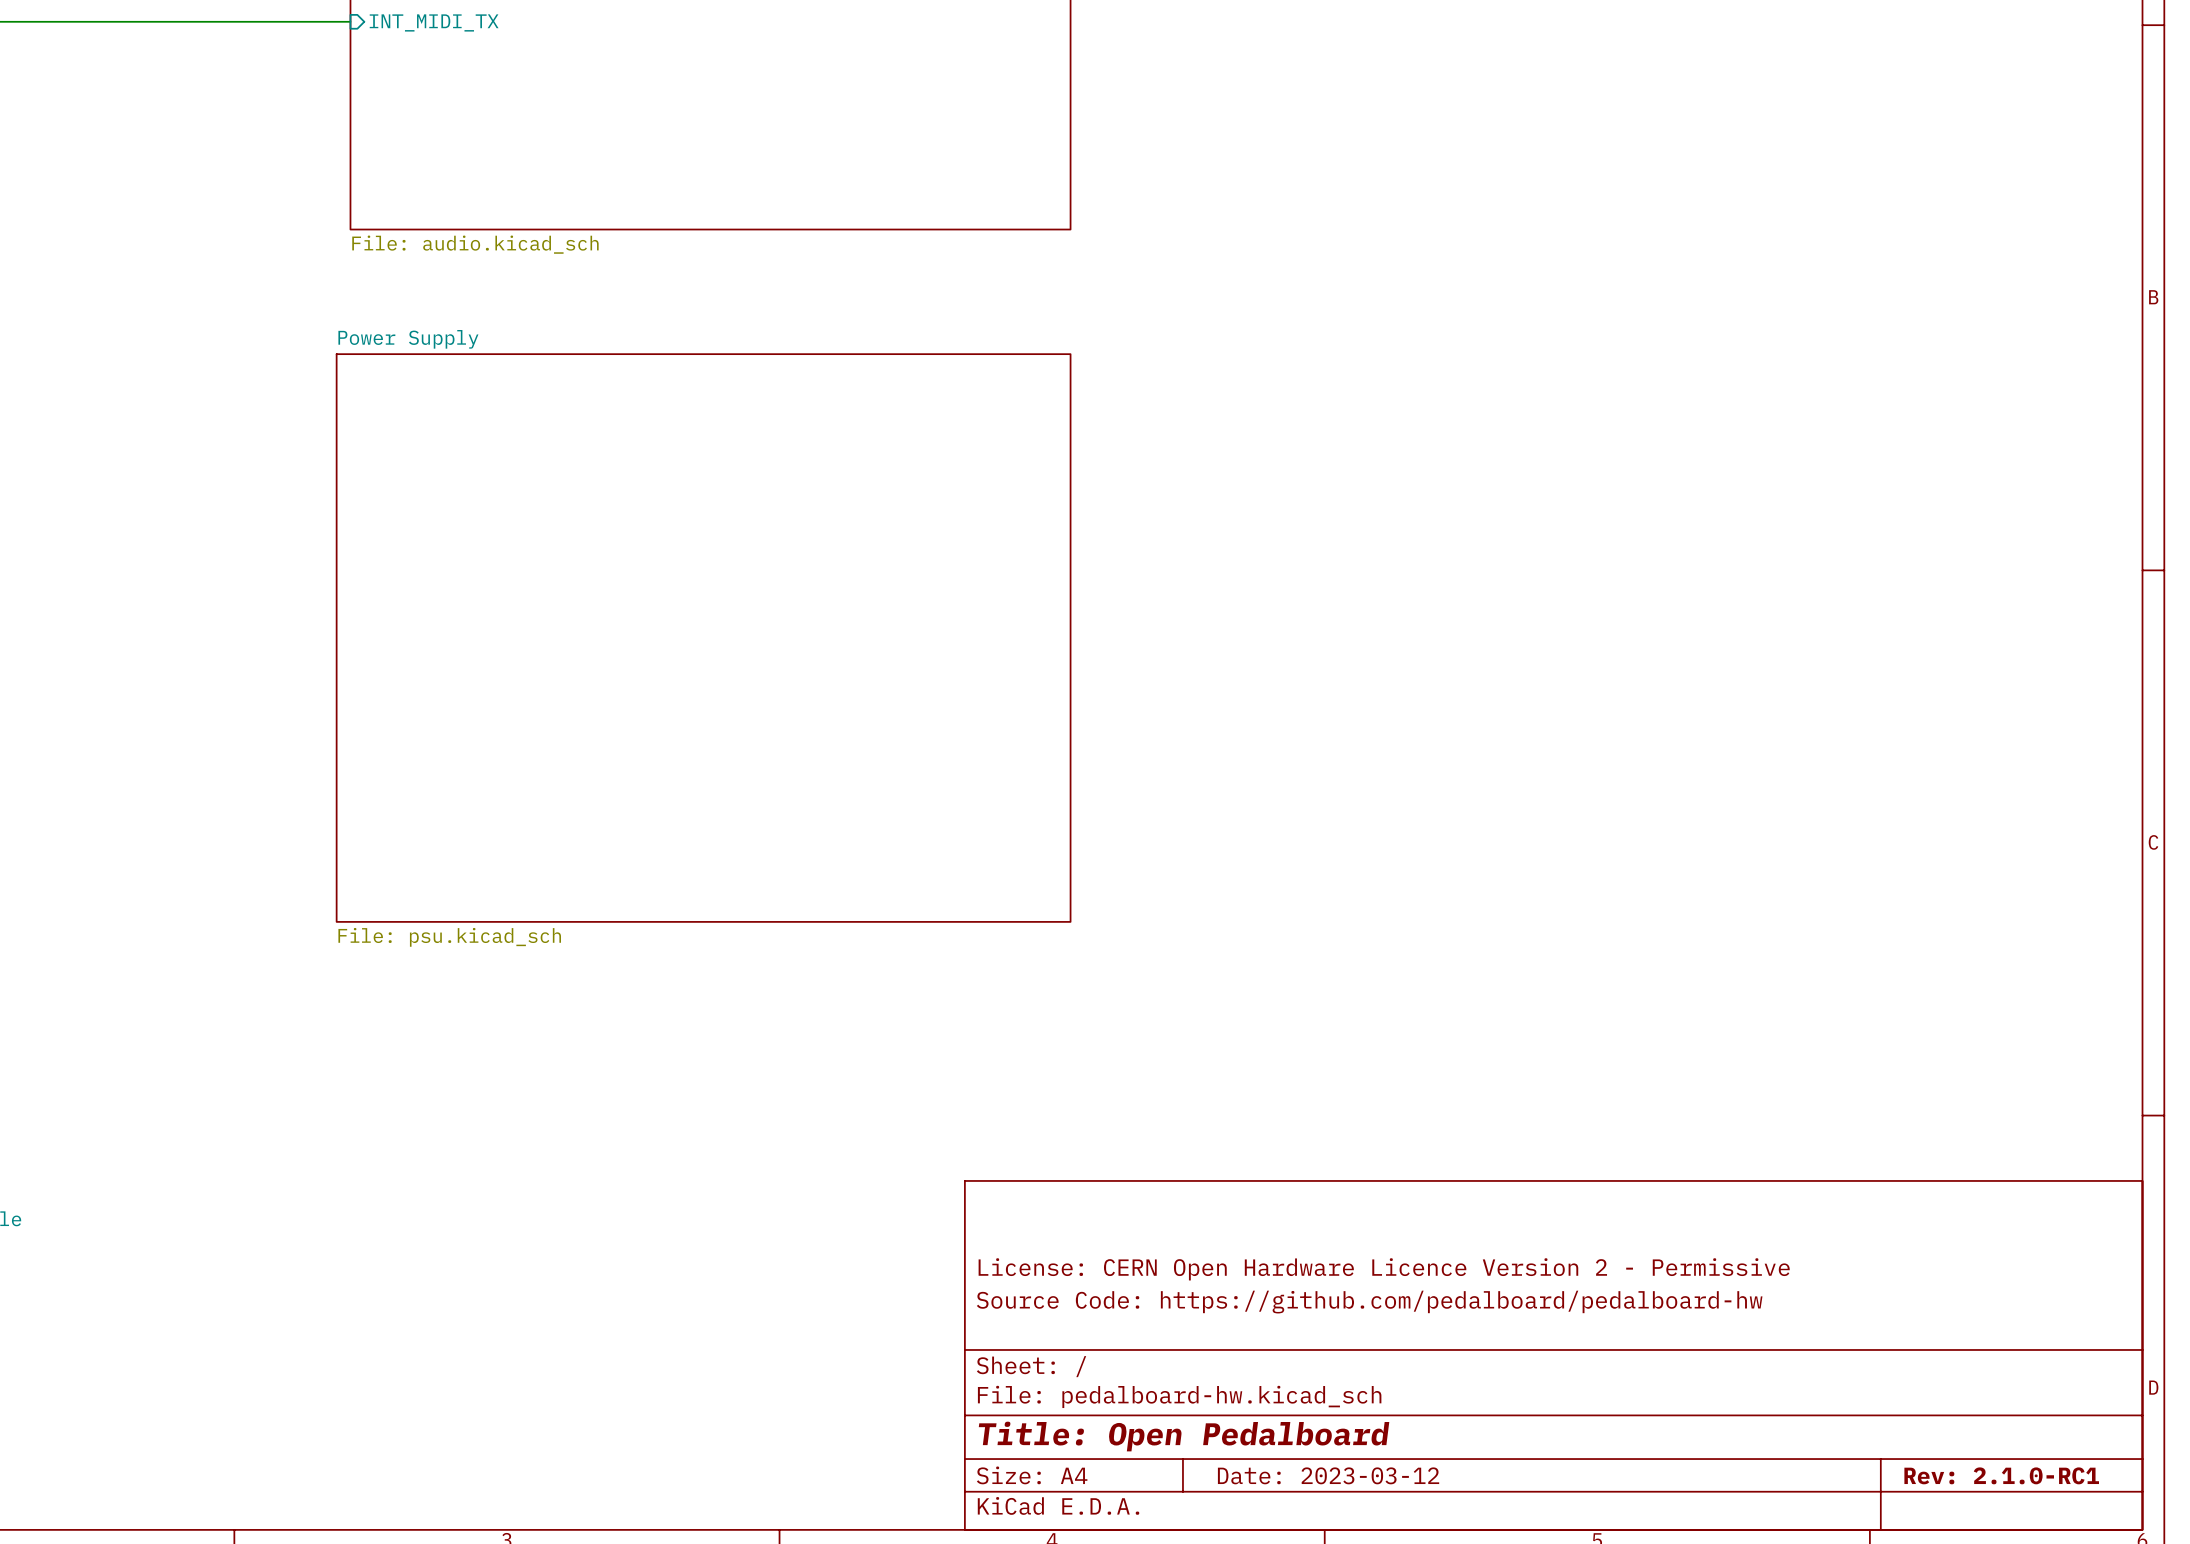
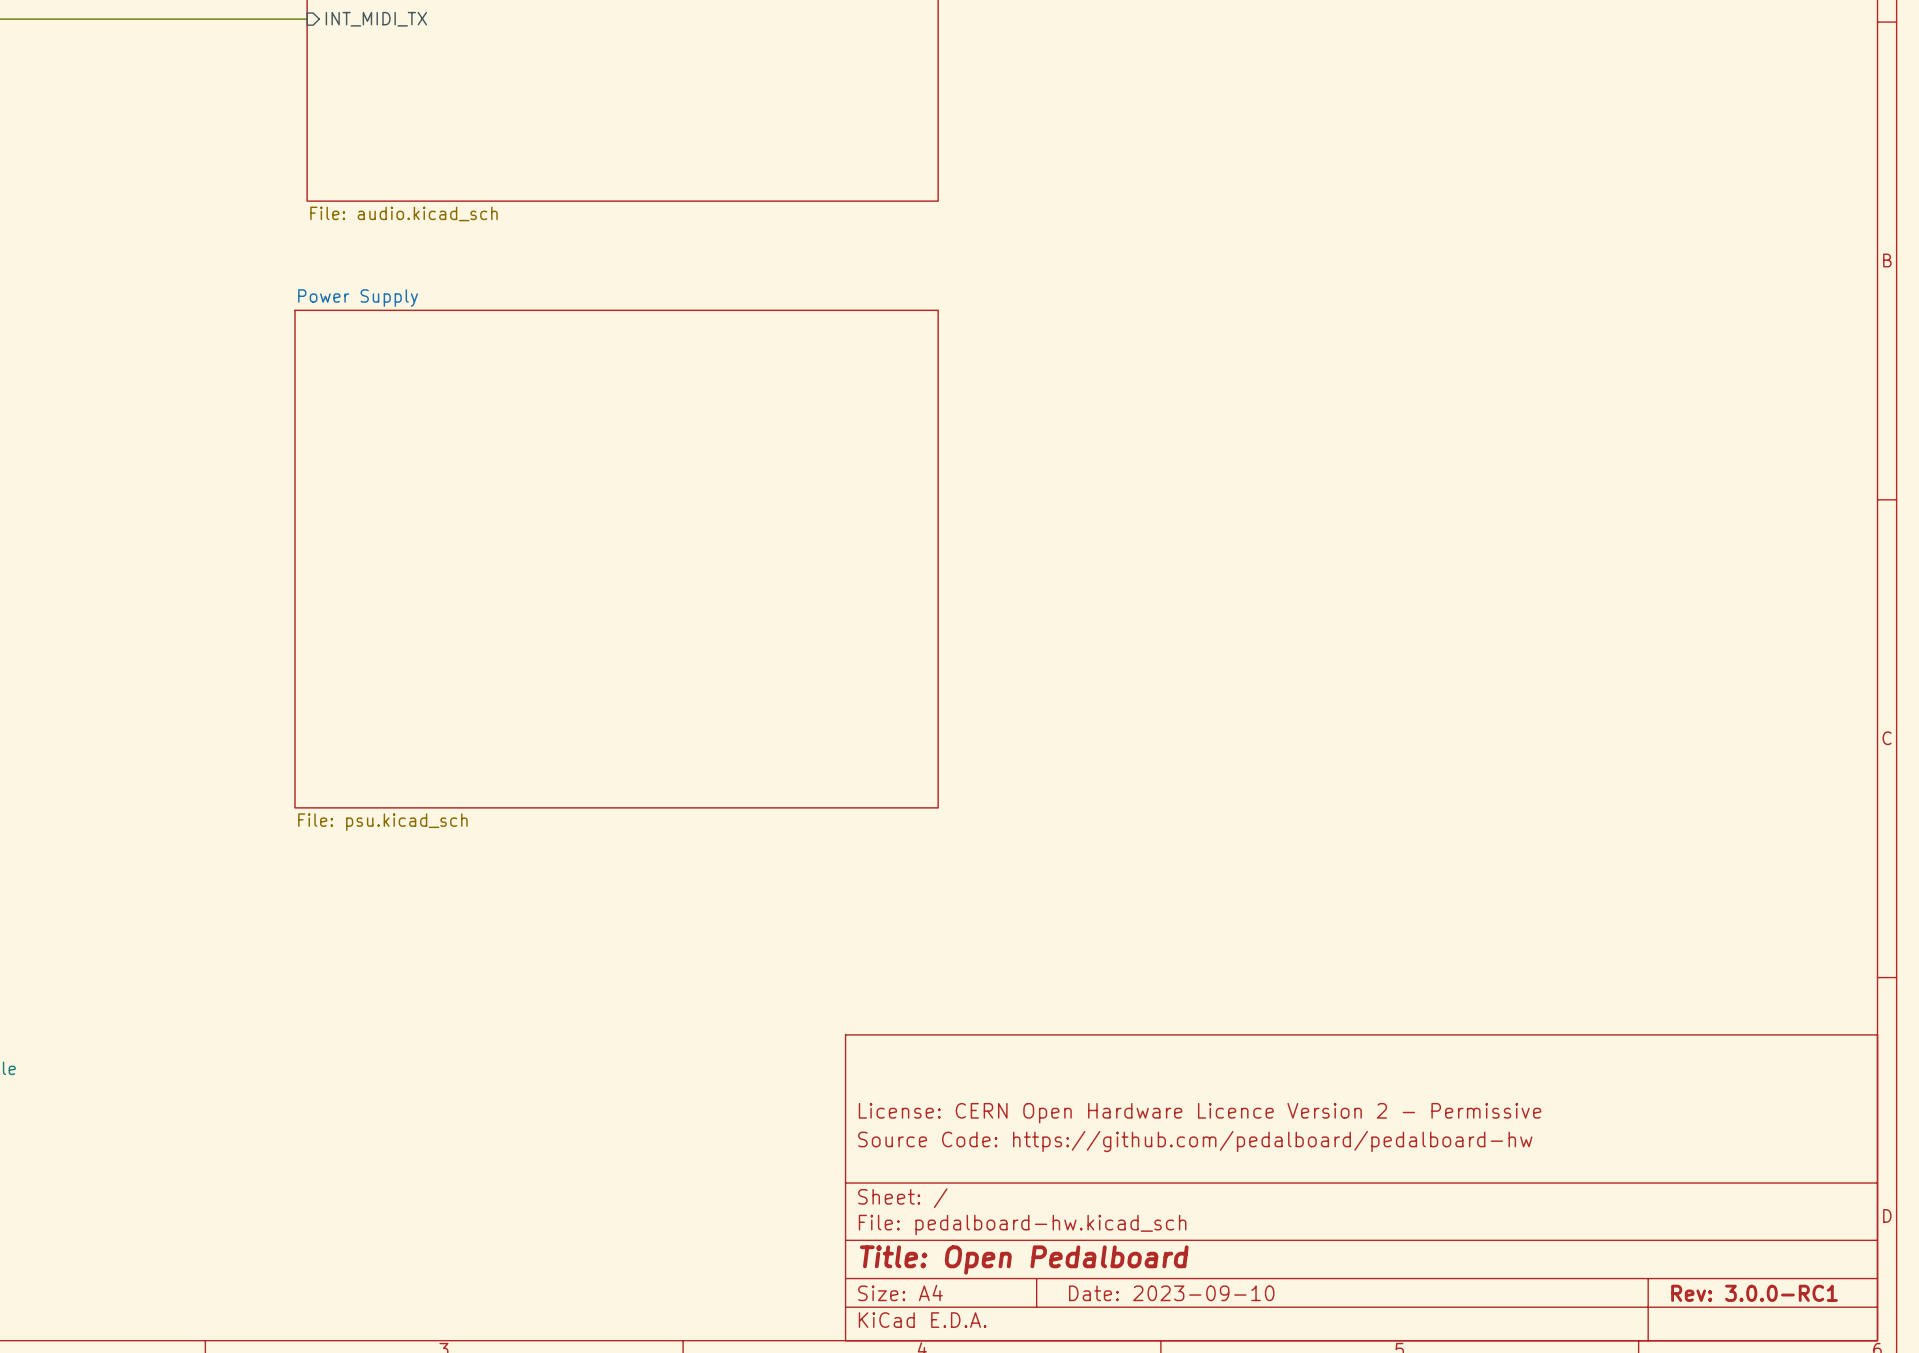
title block: Date: 2023-03-12 (1328, 1475) -> Date: 2023-09-10 (1171, 1293)
title block: Rev: 2.1.0-RC1 (2001, 1475) -> Rev: 3.0.0-RC1 (1754, 1293)

